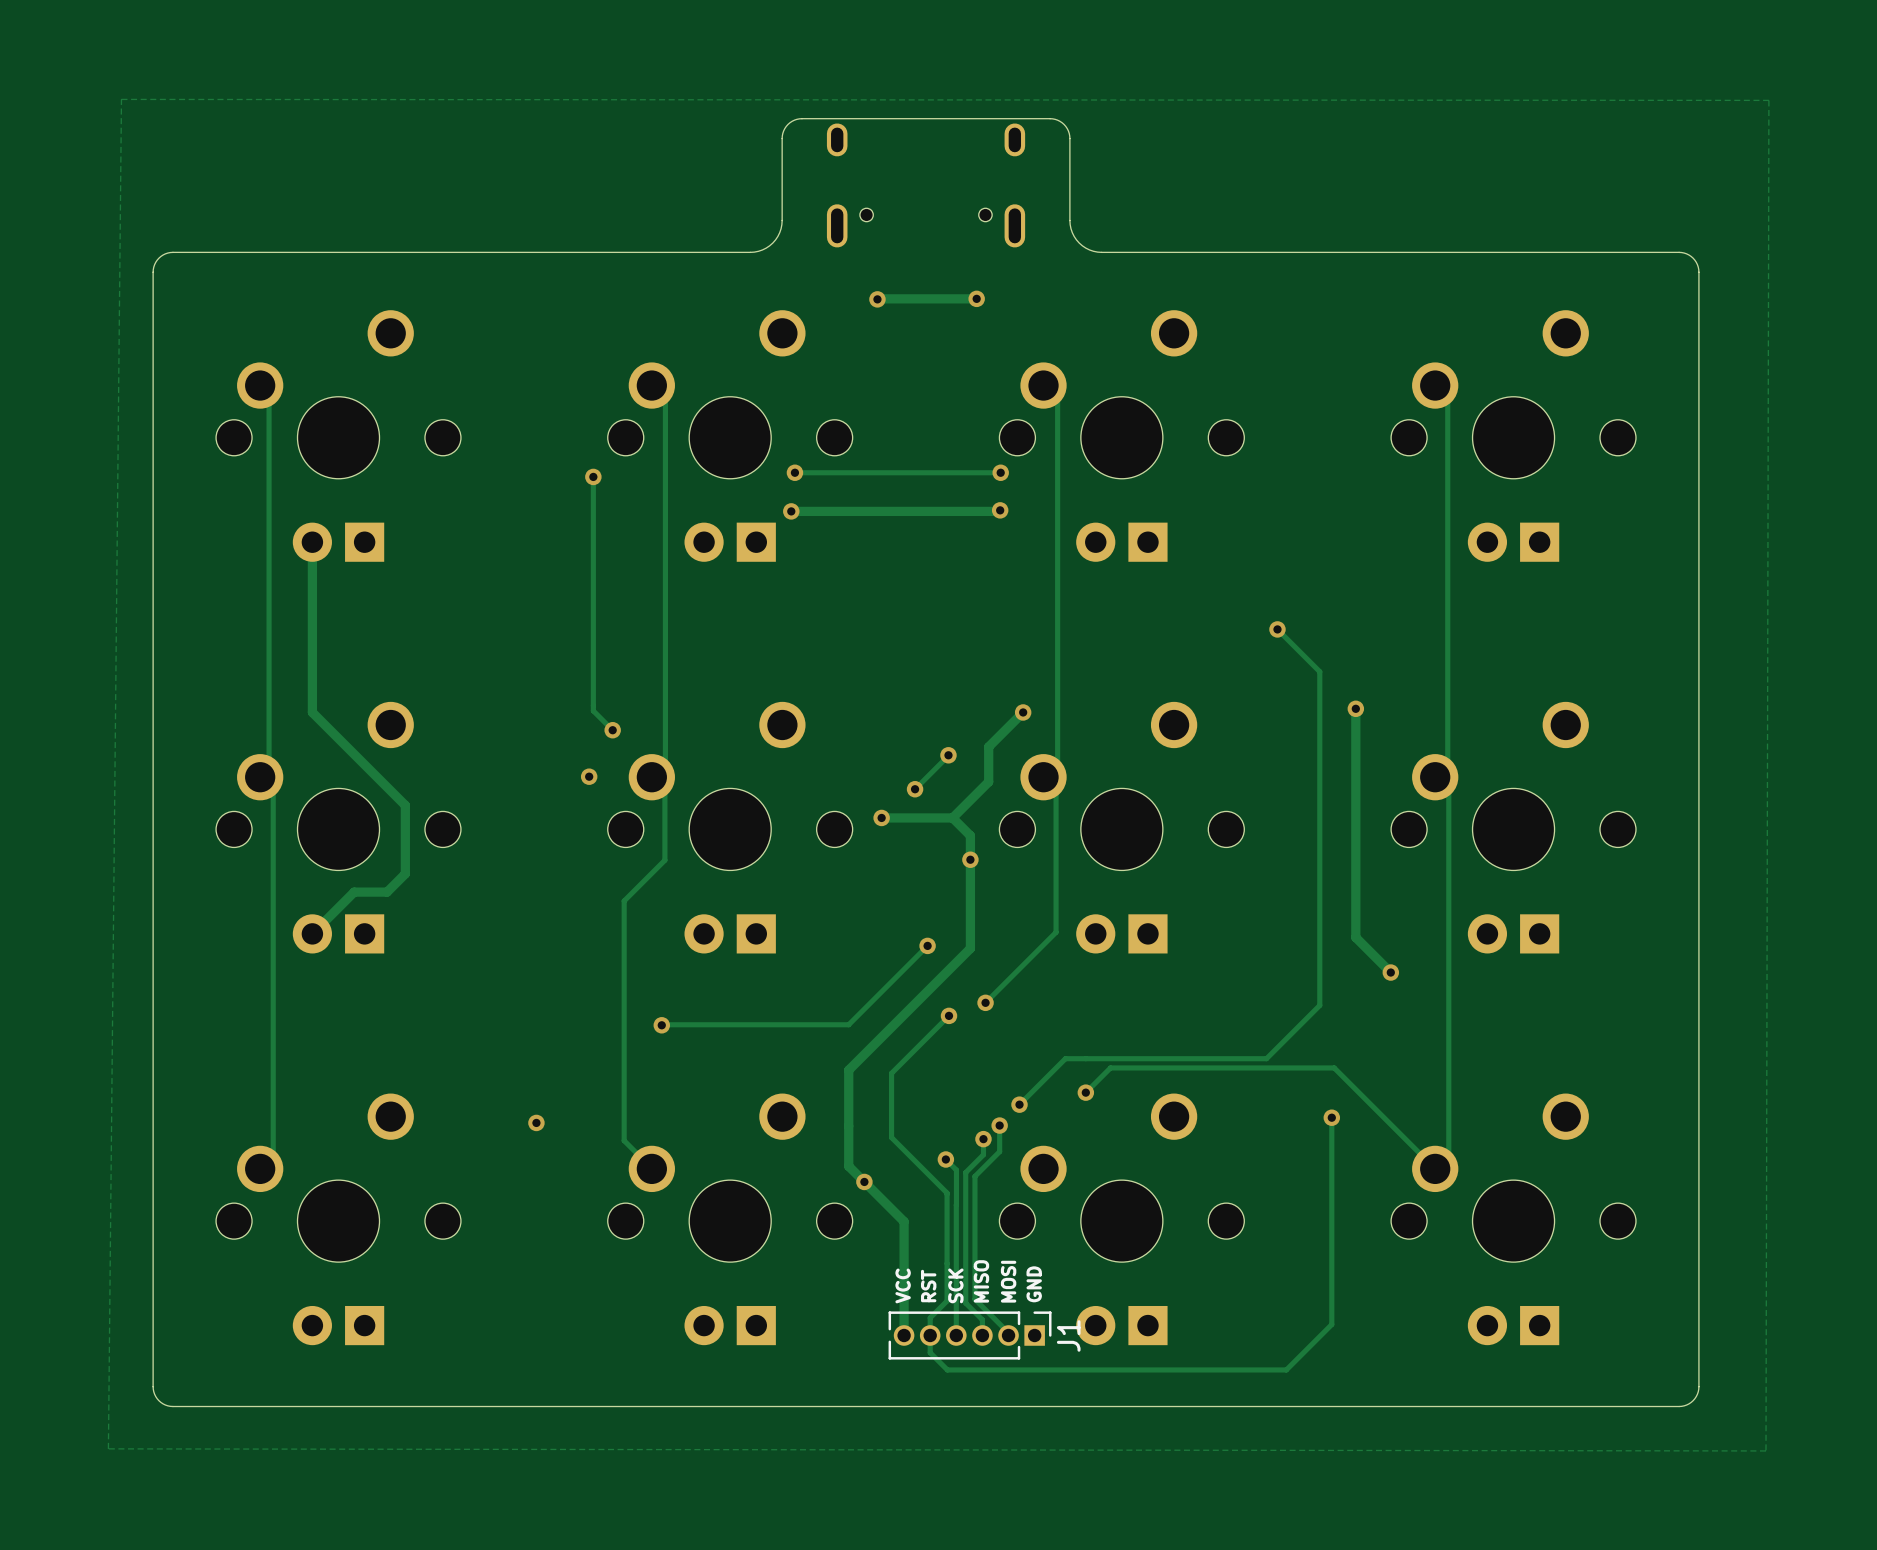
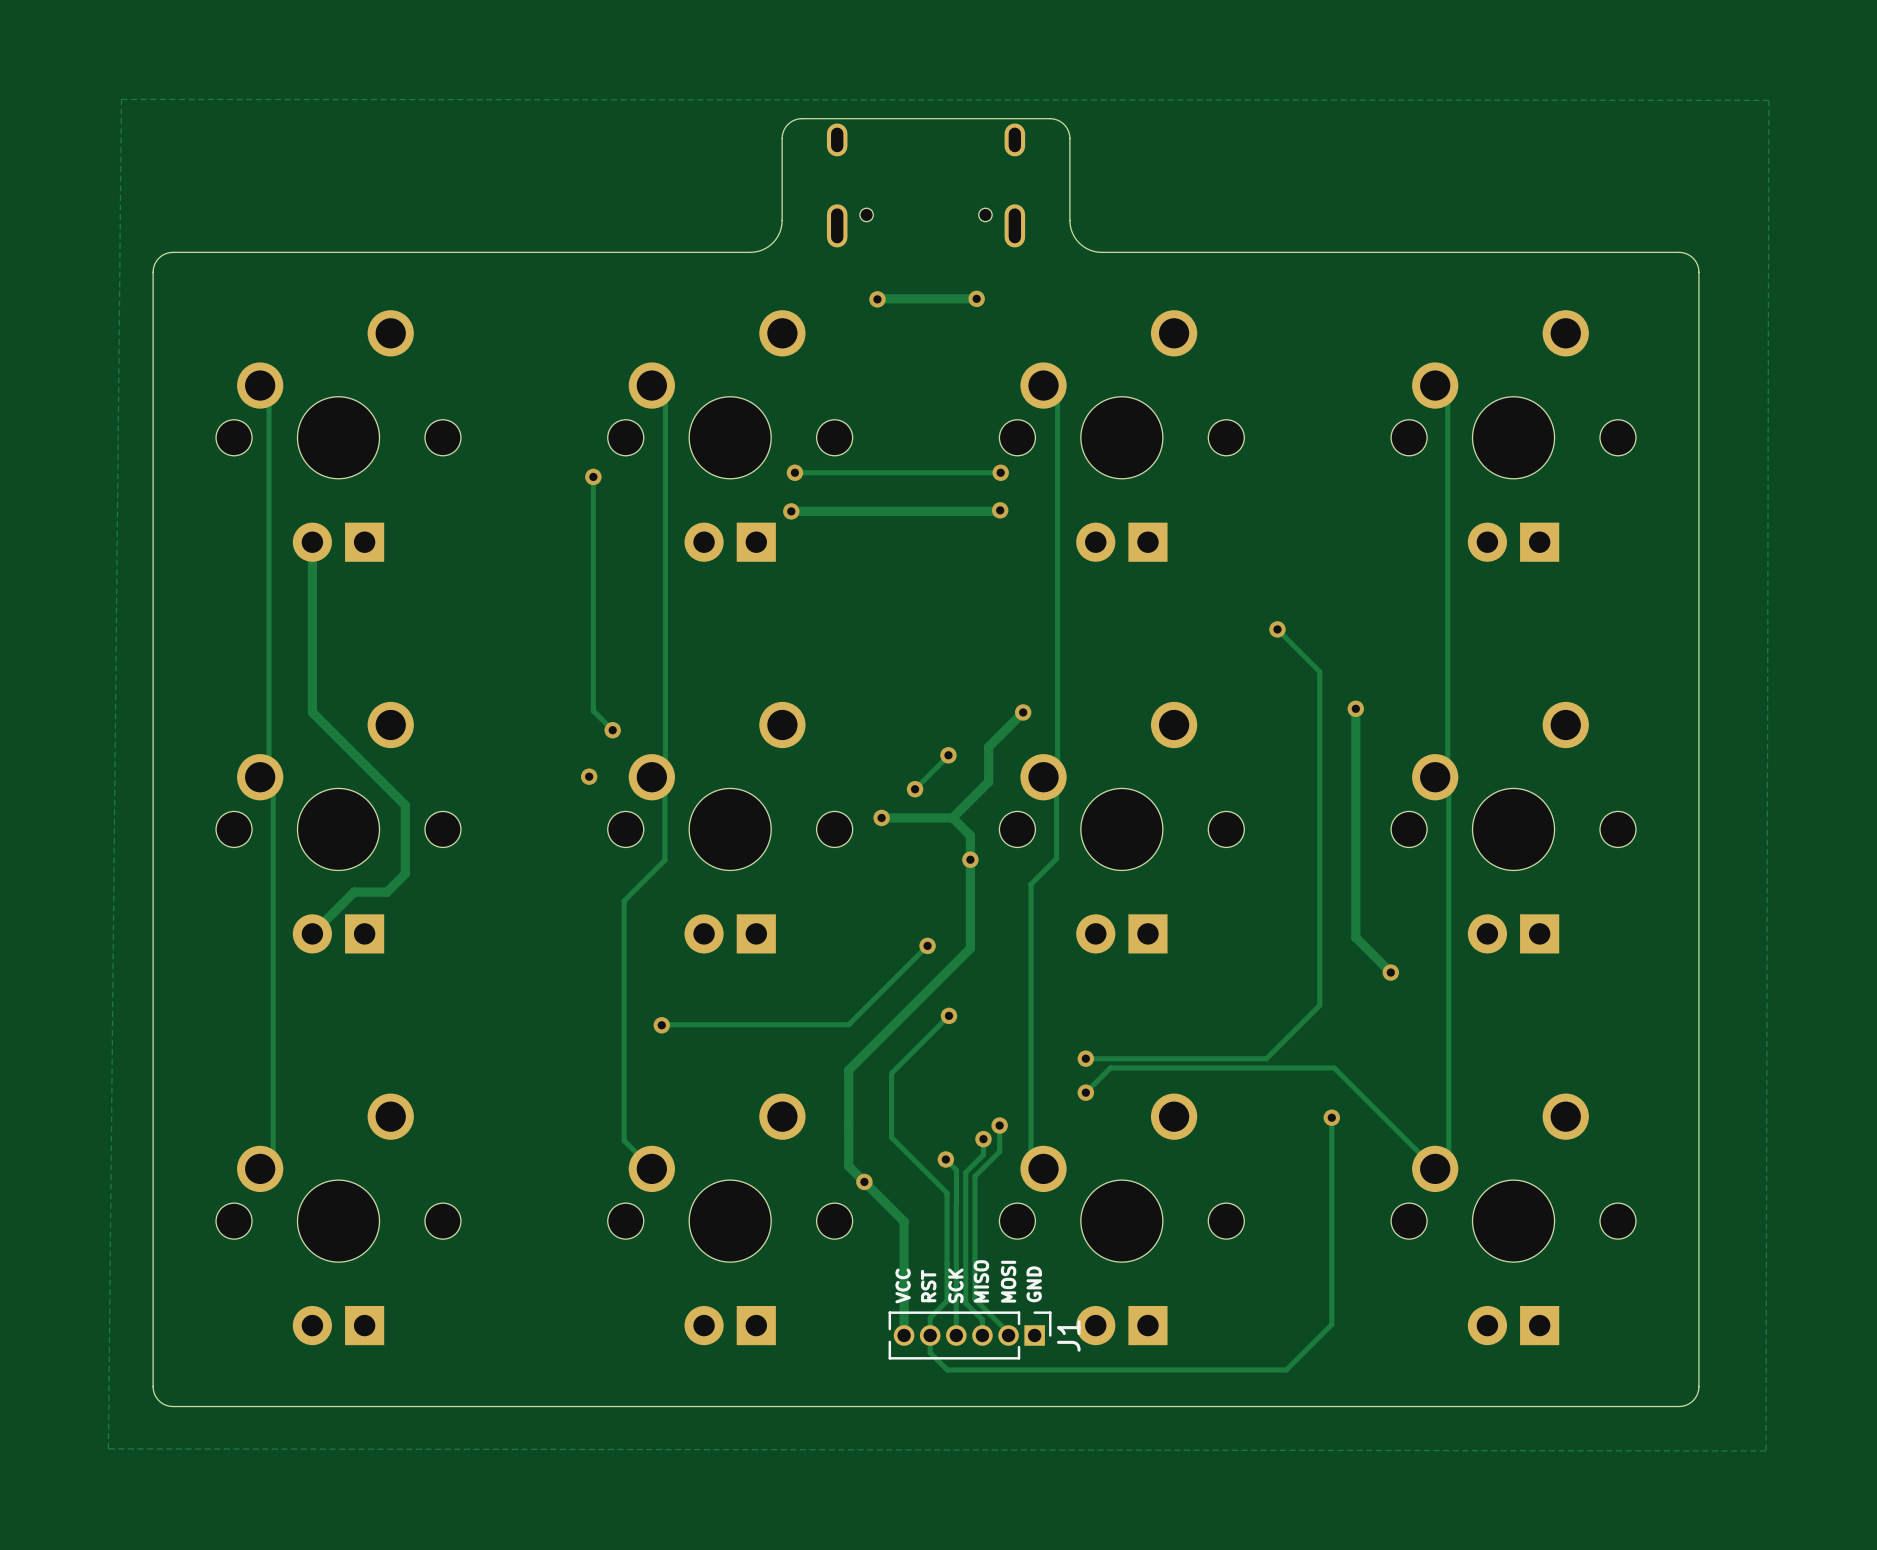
track: (1056, 789) (1056, 932) (985, 1002) -> (1056, 789) (1056, 858) (1030, 884) (1030, 1155) (1043, 1168)
via: (985, 1002) -> none
track: (1085, 1058) (1065, 1058) (1019, 1104) -> none
via: none -> (1085, 1058)
via: (1019, 1104) -> none
via: (536, 1122) -> none

